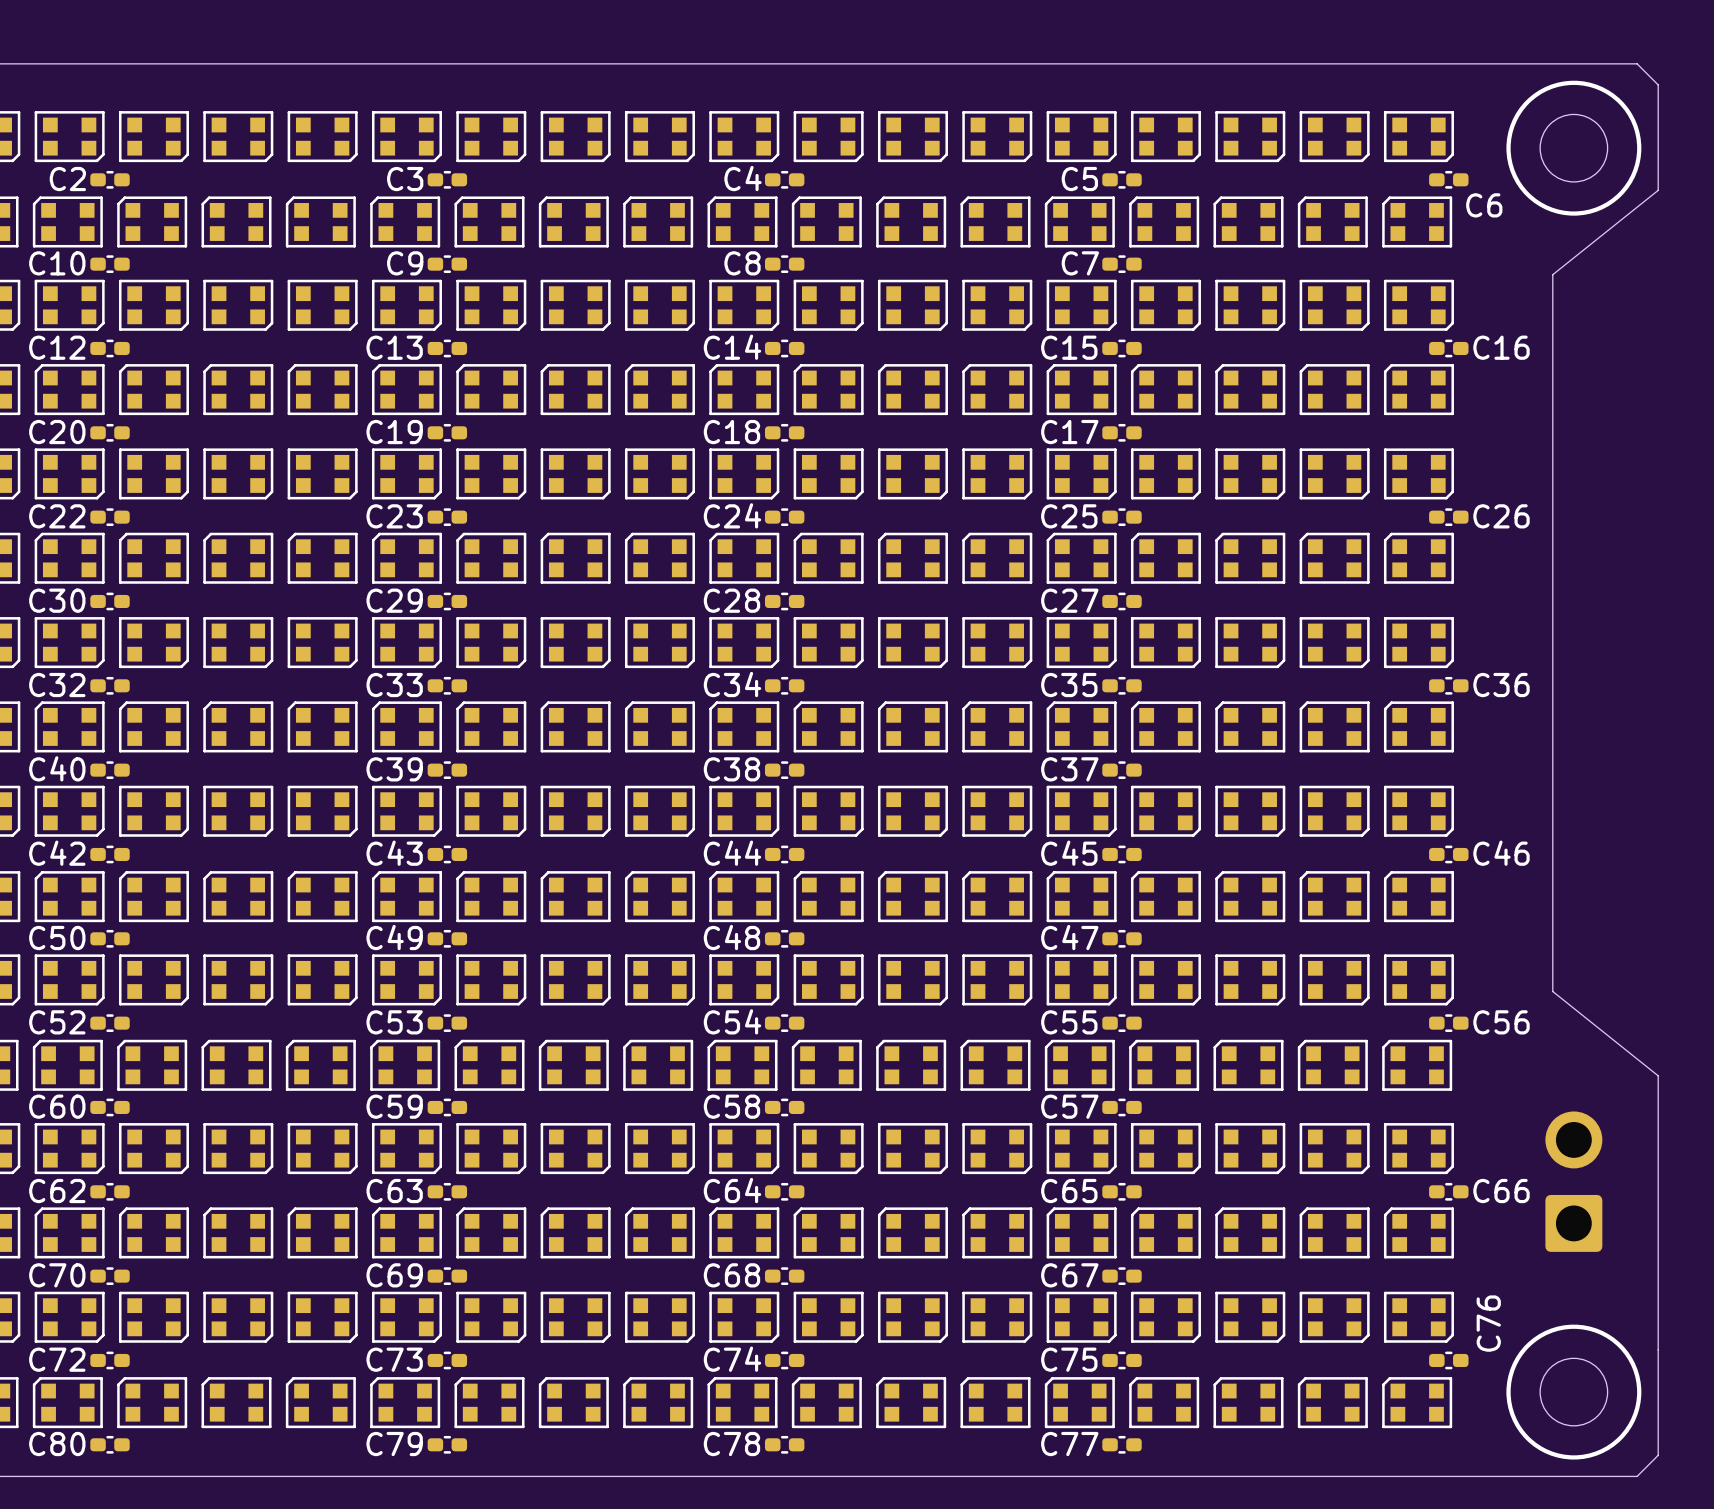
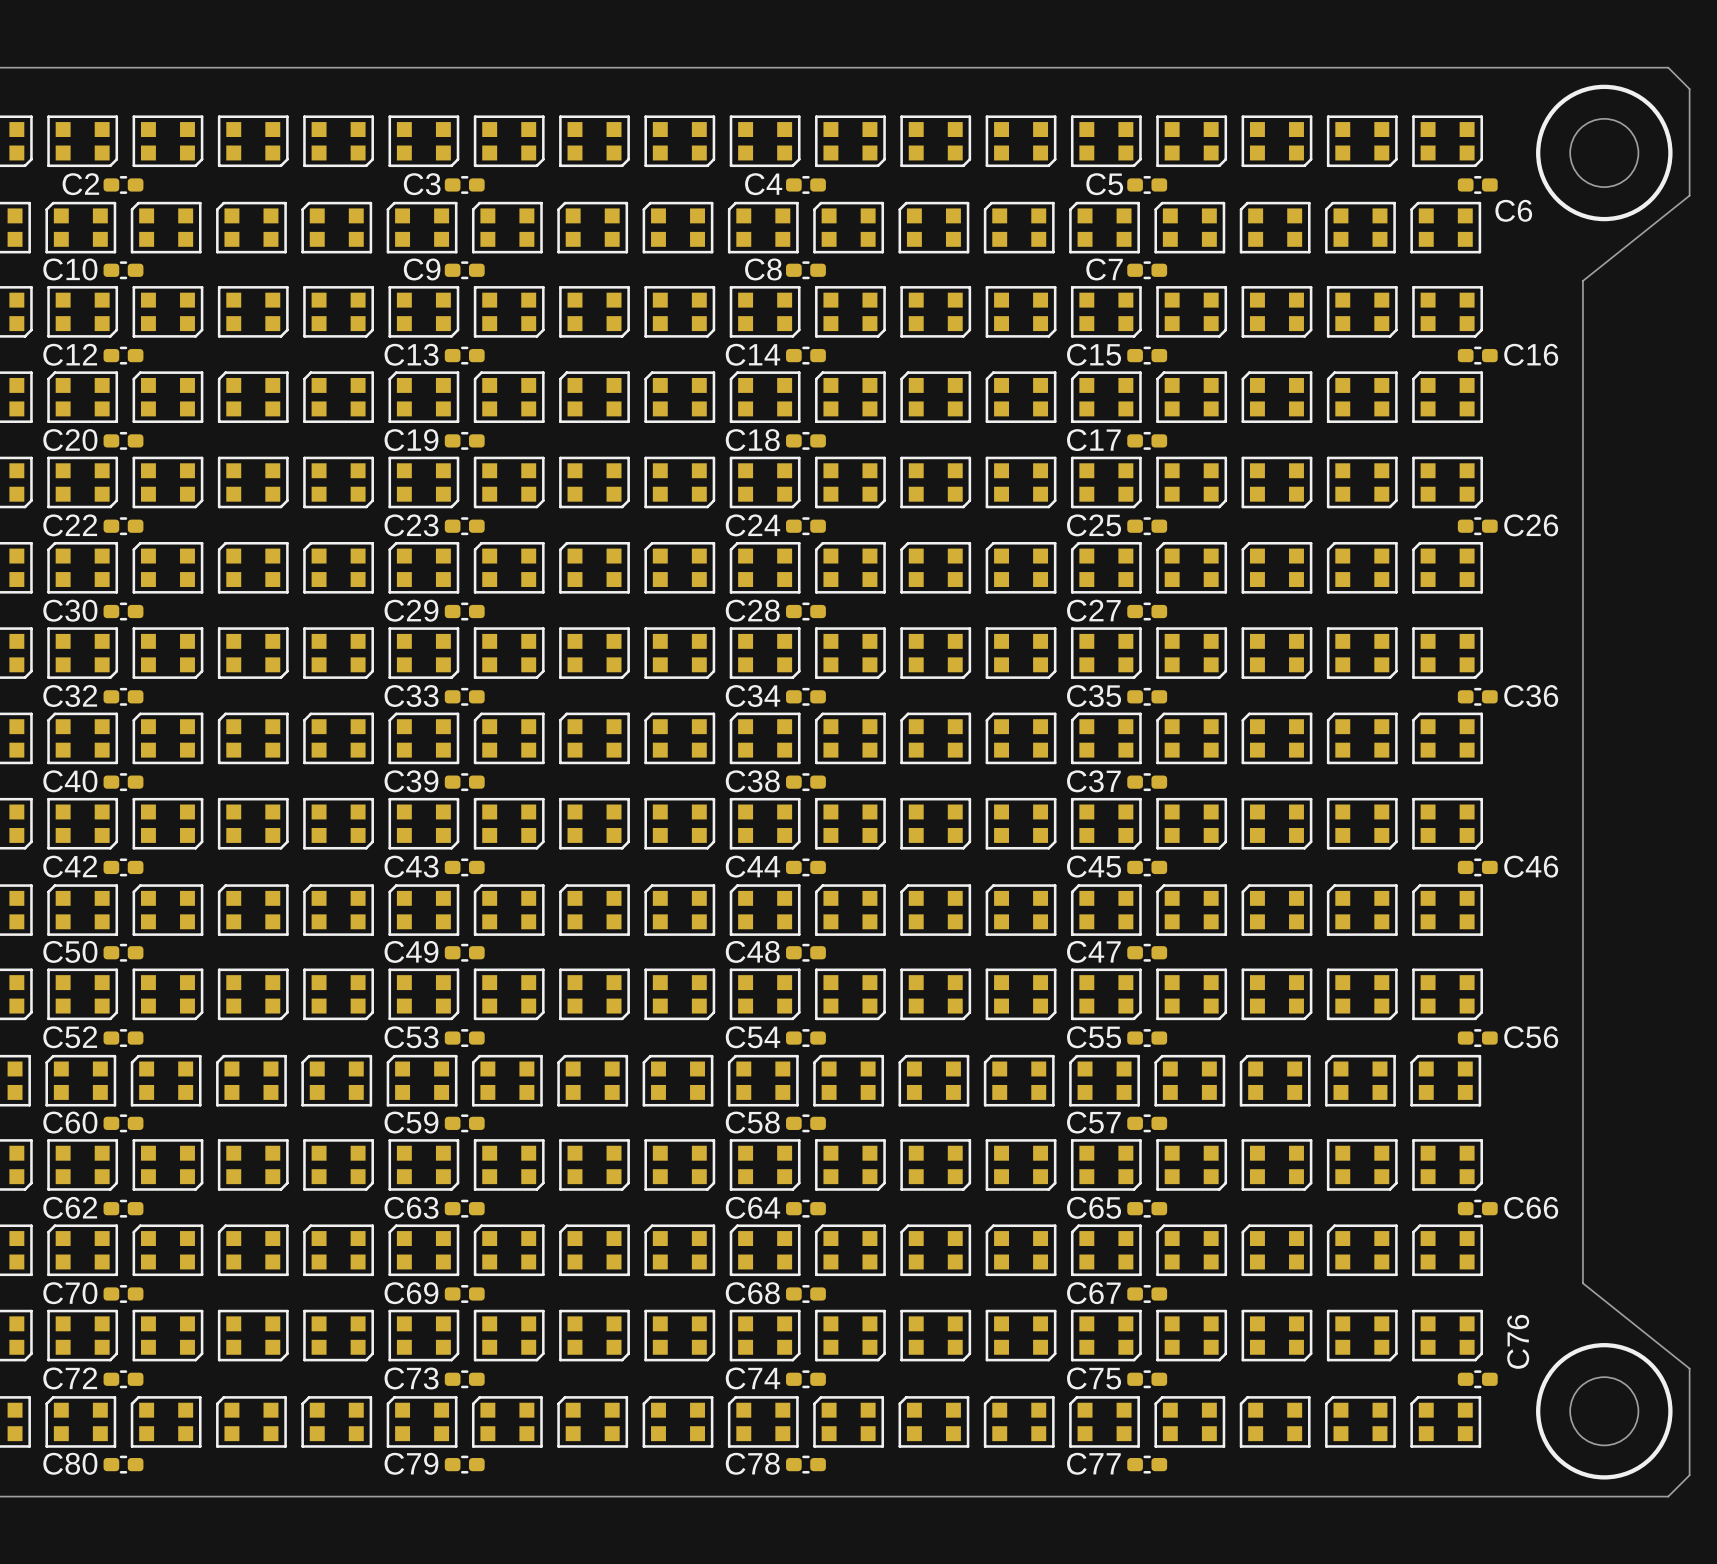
board edge: (1552, 991) (1658, 1075) (1658, 1349) -> (1582, 1006) (1582, 1283) (1689, 1368)
part: (1573, 1181) -> none

